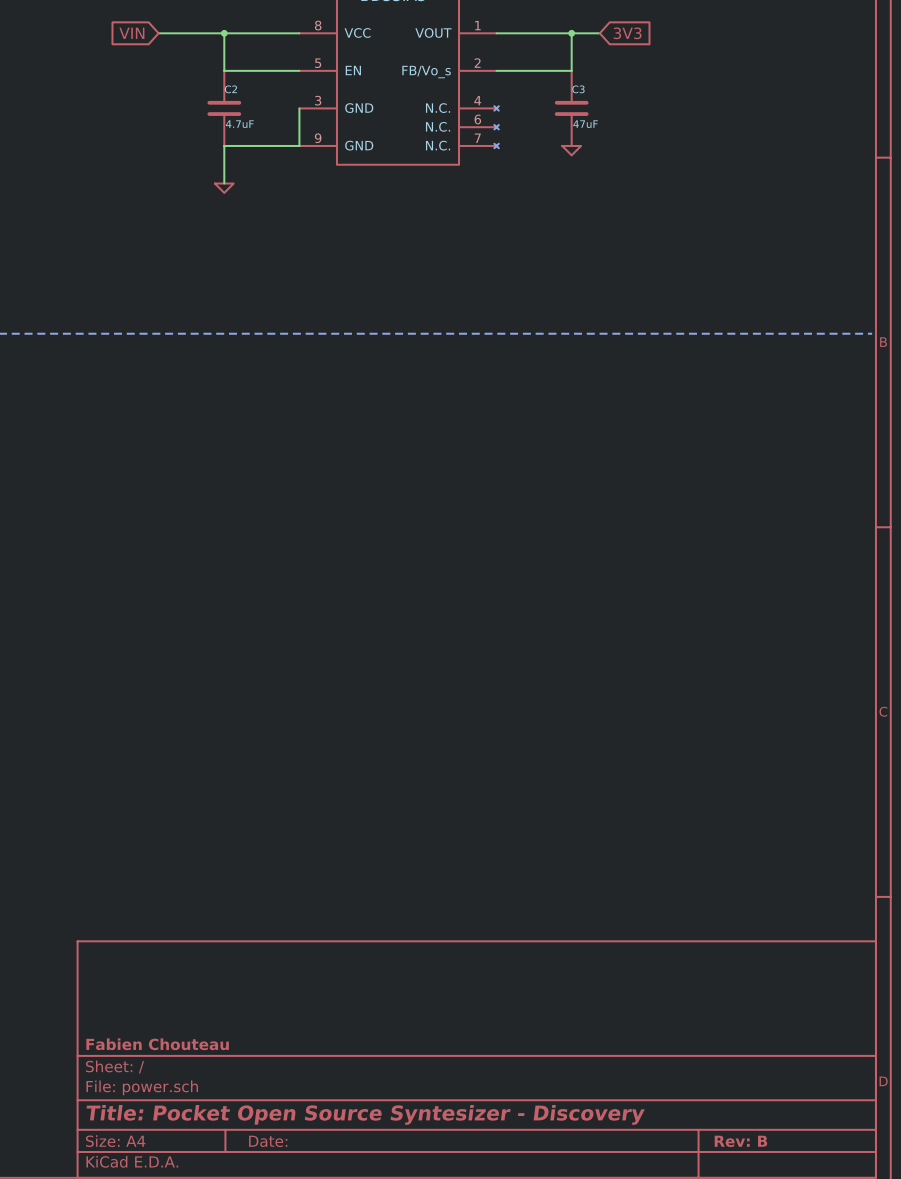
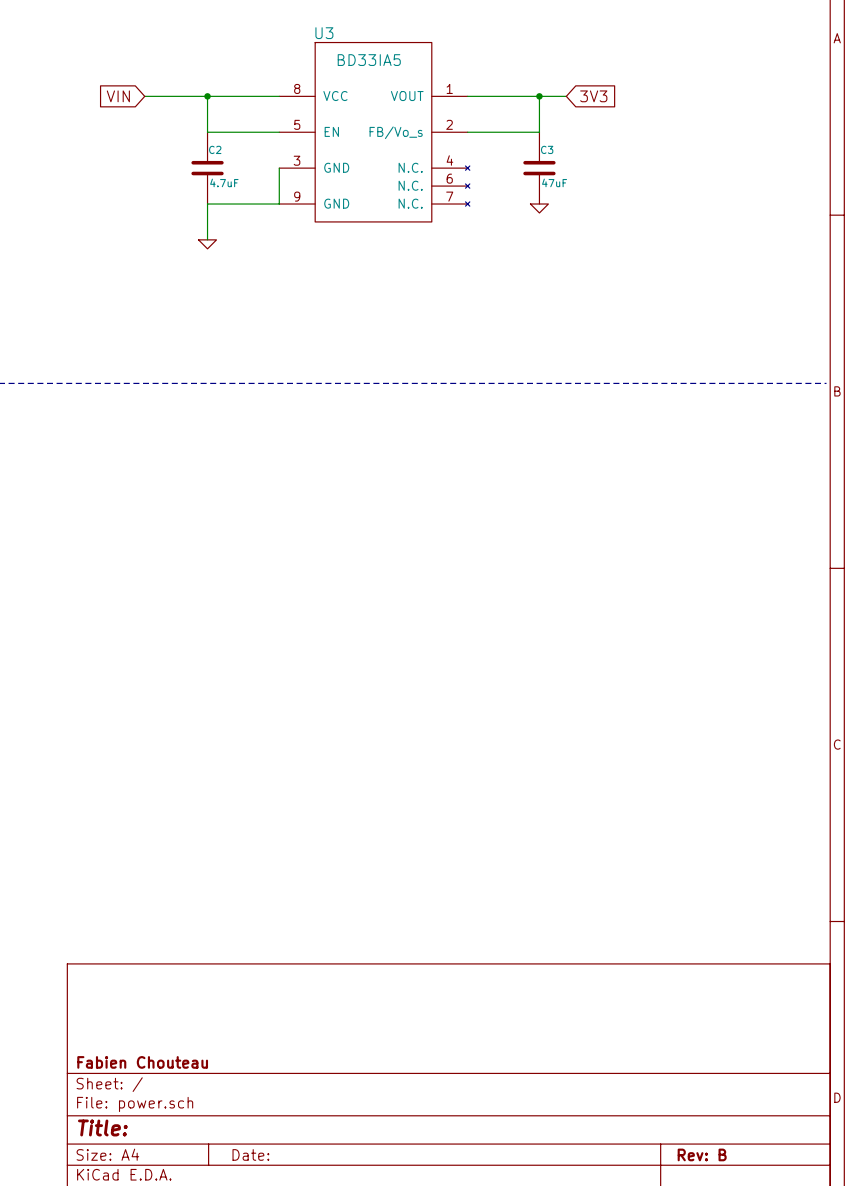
title block: Title: Pocket Open Source Syntesizer - Discovery (365, 1114) -> Title: (102, 1127)

